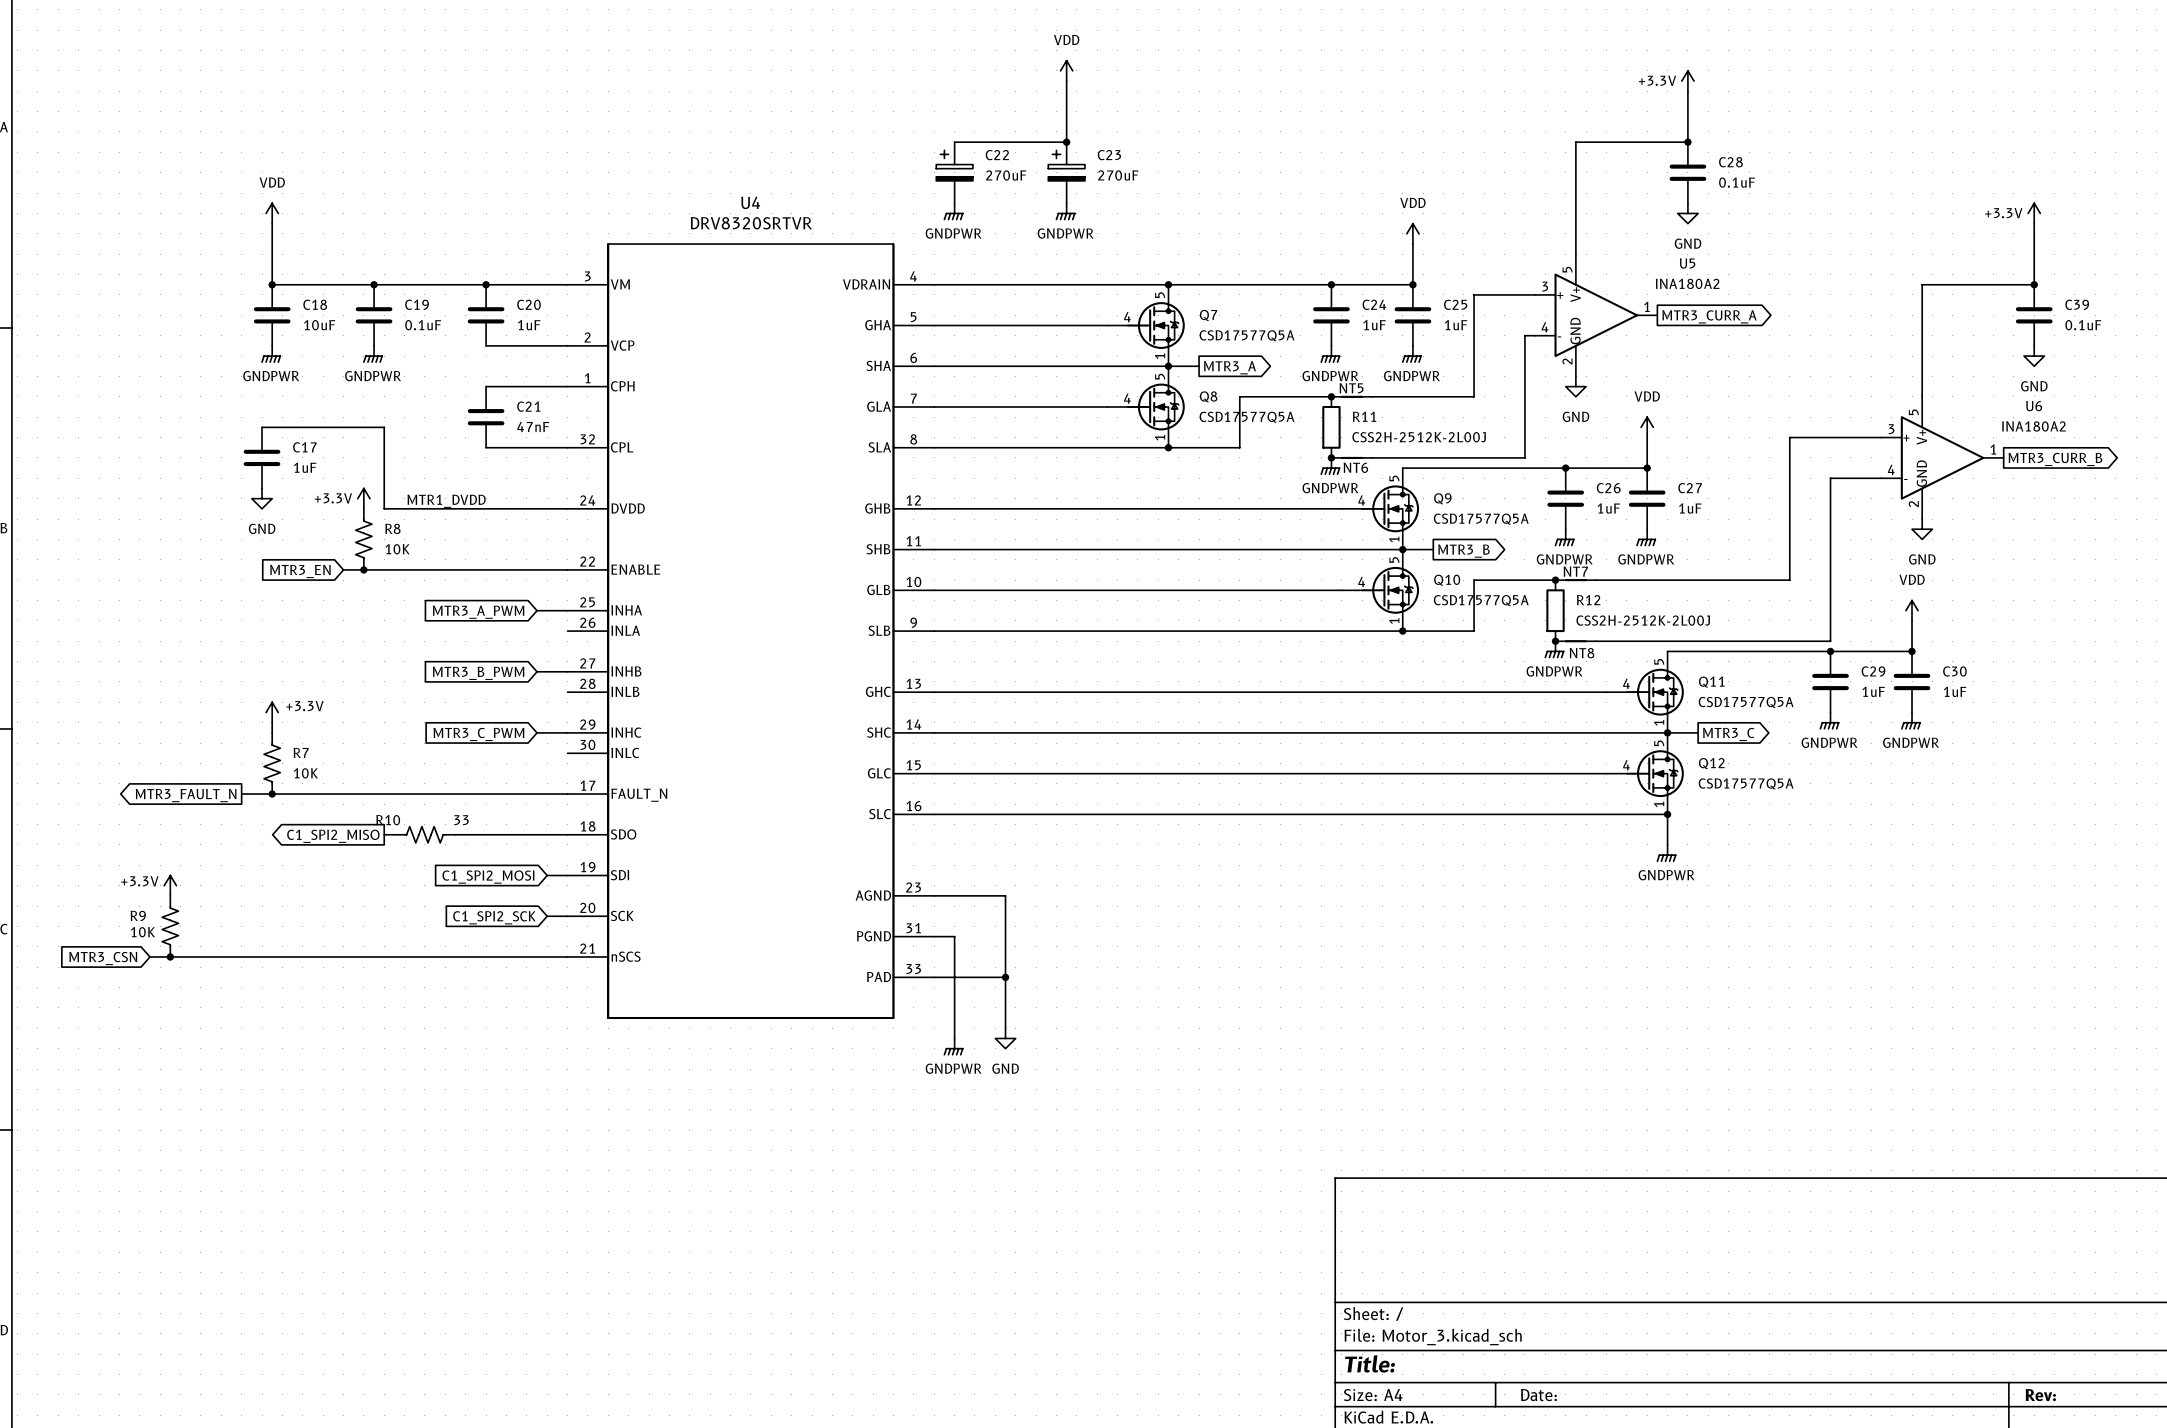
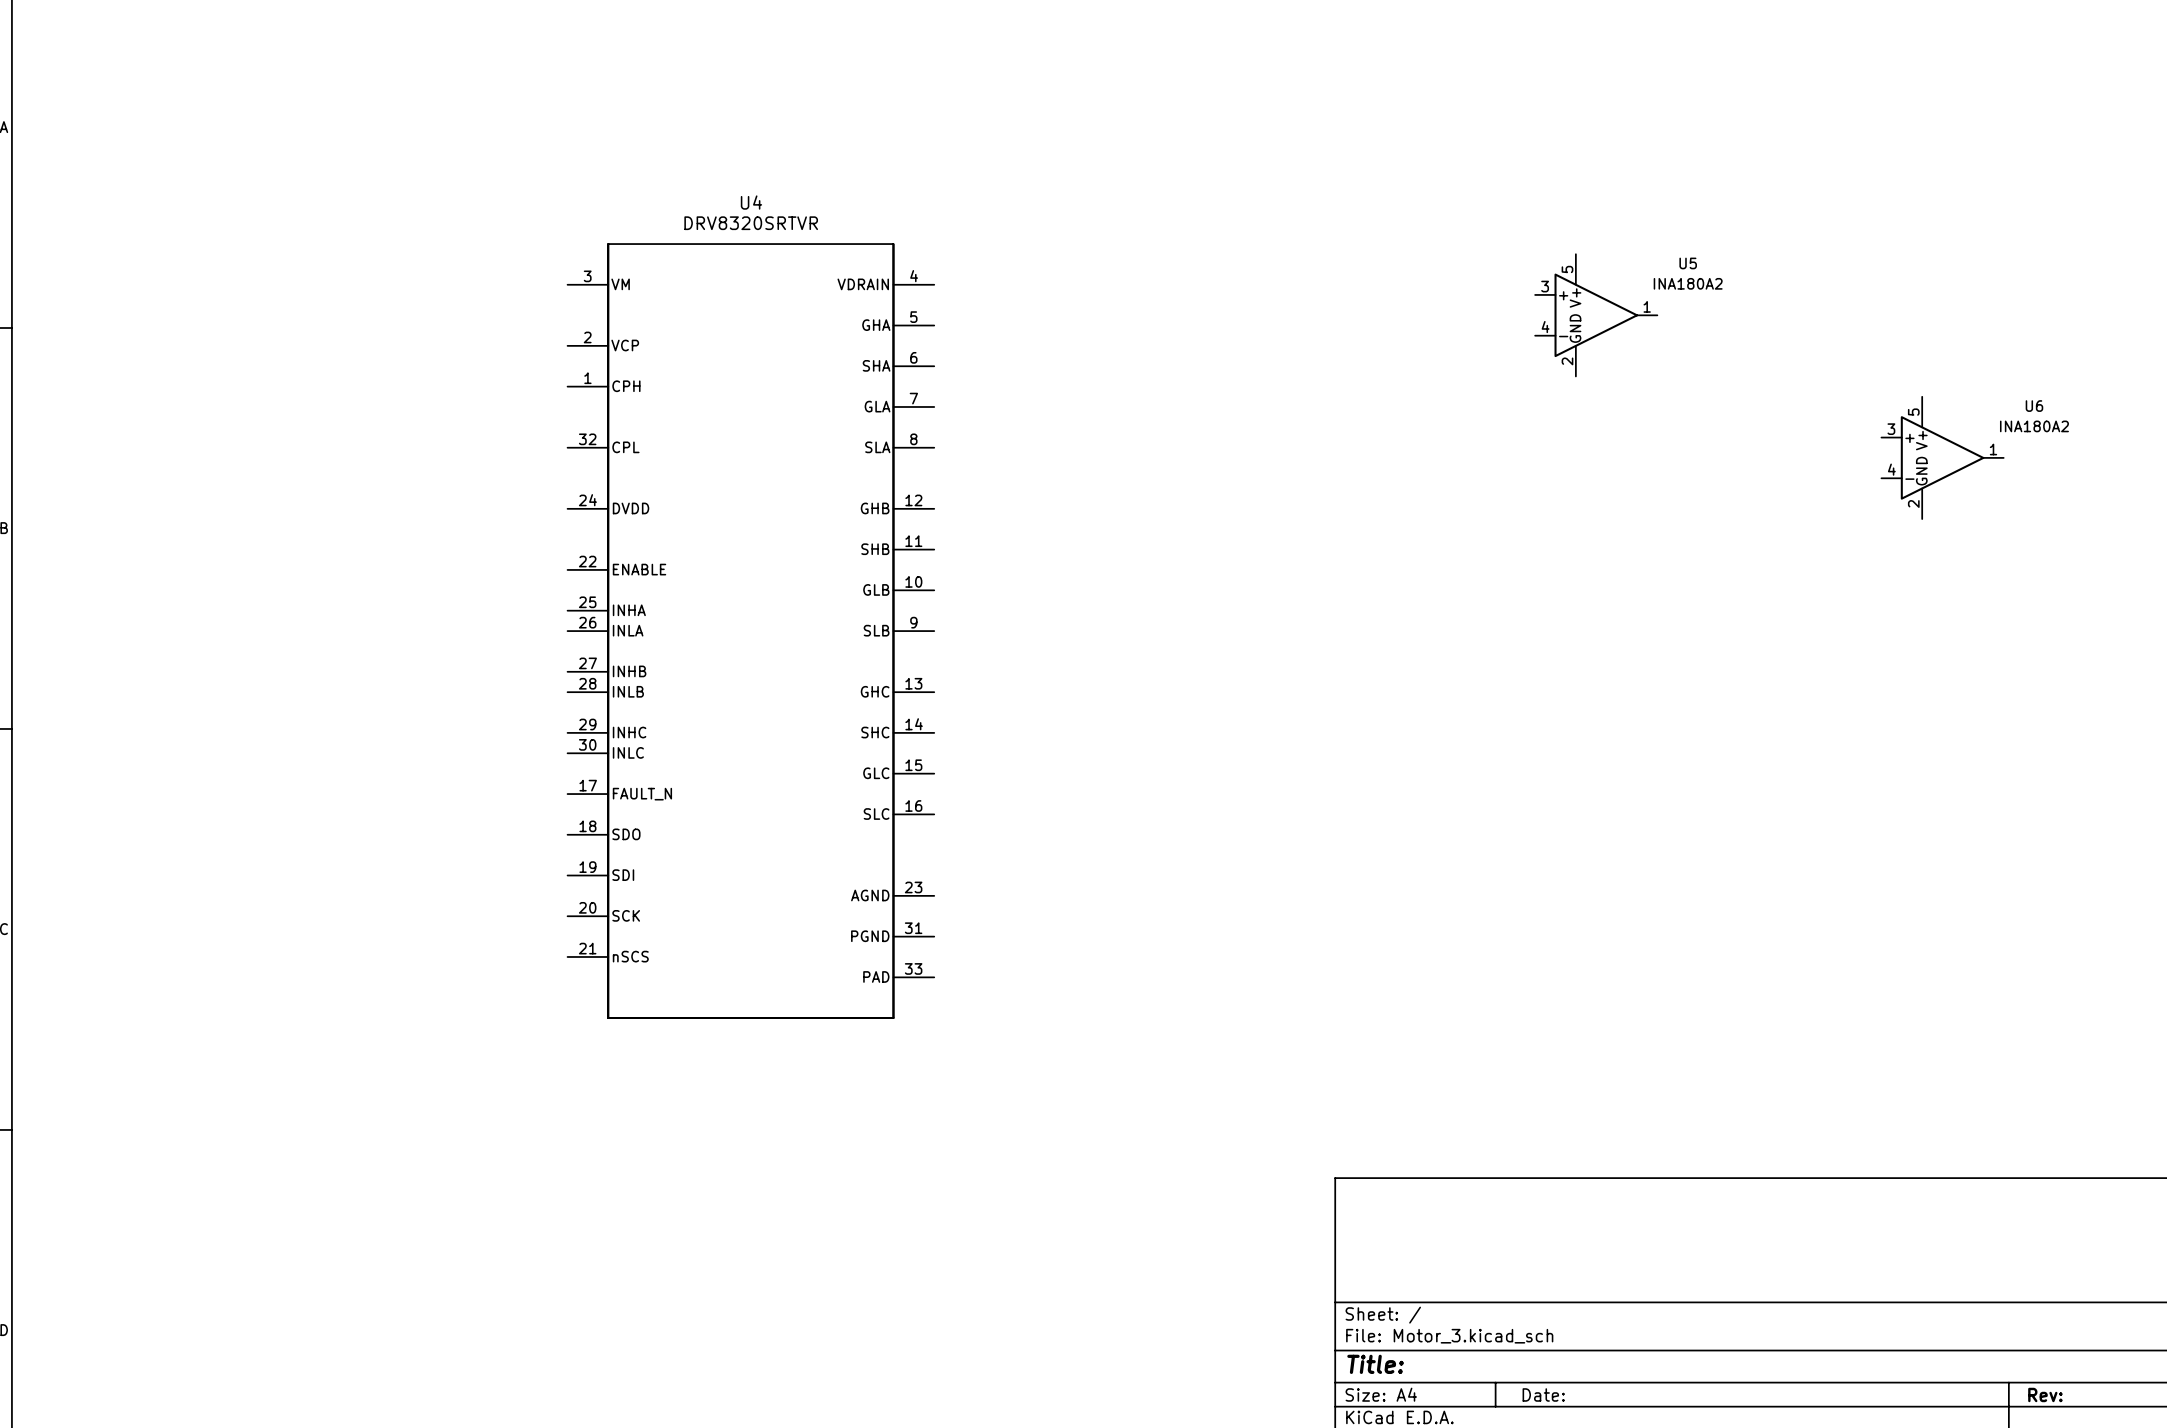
power symbol: VDD (1066, 70) -> none
wire: (1066, 81) (1066, 142) (954, 142) -> none
power symbol: +3.3V (1687, 81) -> none
wire: (1687, 91) (1687, 142) (1575, 142) (1575, 254) -> none
junction: (1066, 142) -> none
junction: (1687, 142) -> none
C22: 270uF (954, 172) -> none
C23: 270uF (1066, 172) -> none
C28: 0.1uF (1687, 172) -> none
power symbol: GNDPWR (953, 211) -> none
power symbol: GNDPWR (1065, 211) -> none
power symbol: VDD (272, 213) -> none
power symbol: GND (1687, 213) -> none
power symbol: +3.3V (2034, 213) -> none
wire: (272, 223) (272, 284) (567, 284) -> none
wire: (2034, 223) (2034, 284) (1922, 284) (1922, 396) -> none
power symbol: VDD (1412, 233) -> none
wire: (1412, 244) (1412, 284) (934, 284) -> none
junction: (272, 284) -> none
junction: (374, 284) -> none
junction: (486, 284) -> none
junction: (1168, 284) -> none
junction: (1331, 284) -> none
junction: (1412, 284) -> none
junction: (2034, 284) -> none
wire: (1535, 294) (1474, 294) (1474, 396) (1372, 396) -> none
C18: 10uF (272, 315) -> none
C19: 0.1uF (374, 315) -> none
C20: 1uF (486, 315) -> none
C24: 1uF (1331, 315) -> none
C25: 1uF (1412, 315) -> none
C39: 0.1uF (2034, 315) -> none
global label: MTR3_CURR_A (1709, 316) -> none
wire: (934, 325) (1107, 325) -> none
Q7: CSD17577Q5A (1146, 325) -> none
wire: (1535, 335) (1524, 335) (1524, 457) (1372, 457) -> none
wire: (486, 345) (567, 345) -> none
power symbol: GNDPWR (271, 354) -> none
power symbol: GNDPWR (373, 354) -> none
power symbol: GNDPWR (1330, 354) -> none
power symbol: GNDPWR (1411, 354) -> none
power symbol: GND (2034, 356) -> none
wire: (934, 366) (1199, 366) -> none
junction: (1168, 366) -> none
global label: MTR3_A (1230, 367) -> none
wire: (486, 386) (567, 386) -> none
power symbol: GND (1575, 386) -> none
wire: (1331, 396) (1239, 396) (1239, 447) (934, 447) -> none
junction: (1331, 396) -> none
NT5: (1351, 396) -> none
wire: (934, 406) (1107, 406) -> none
Q8: CSD17577Q5A (1146, 406) -> none
C21: 47nF (486, 417) -> none
wire: (262, 427) (384, 427) (384, 508) (567, 508) -> none
R11: CSS2H-2512K-2L00J (1331, 427) -> none
power symbol: VDD (1647, 427) -> none
wire: (1647, 437) (1647, 468) (1402, 468) -> none
wire: (1881, 437) (1789, 437) (1789, 580) (1596, 580) -> none
wire: (486, 447) (567, 447) -> none
junction: (1168, 447) -> none
C17: 1uF (262, 457) -> none
junction: (1331, 457) -> none
NT6: (1351, 457) -> none
global label: MTR3_CURR_B (2055, 459) -> none
power symbol: GNDPWR (1330, 466) -> none
junction: (1565, 468) -> none
junction: (1647, 468) -> none
wire: (1881, 478) (1830, 478) (1830, 641) (1596, 641) -> none
power symbol: GND (262, 498) -> none
power symbol: +3.3V (363, 498) -> none
C26: 1uF (1565, 498) -> none
C27: 1uF (1647, 498) -> none
label: MTR1_DVDD (446, 501) -> none
wire: (934, 508) (1341, 508) -> none
Q9: CSD17577Q5A (1380, 508) -> none
power symbol: GND (1922, 529) -> none
power symbol: GNDPWR (1564, 537) -> none
power symbol: GNDPWR (1646, 537) -> none
R8: 10K (363, 539) -> none
wire: (934, 549) (1433, 549) -> none
junction: (1402, 549) -> none
global label: MTR3_B (1463, 551) -> none
wire: (343, 569) (567, 569) -> none
junction: (363, 569) -> none
global label: MTR3_EN (300, 571) -> none
wire: (1555, 580) (1474, 580) (1474, 631) (934, 631) -> none
junction: (1555, 580) -> none
NT7: (1575, 580) -> none
wire: (934, 590) (1341, 590) -> none
Q10: CSD17577Q5A (1380, 590) -> none
wire: (537, 610) (567, 610) -> none
R12: CSS2H-2512K-2L00J (1555, 610) -> none
power symbol: VDD (1912, 610) -> none
global label: MTR3_A_PWM (478, 612) -> none
wire: (1912, 620) (1912, 651) (1667, 651) -> none
junction: (1402, 631) -> none
junction: (1555, 641) -> none
NT8: (1575, 641) -> none
power symbol: GNDPWR (1554, 649) -> none
junction: (1830, 651) -> none
junction: (1912, 651) -> none
wire: (537, 671) (567, 671) -> none
global label: MTR3_B_PWM (478, 673) -> none
C29: 1uF (1830, 681) -> none
C30: 1uF (1912, 681) -> none
wire: (934, 692) (1606, 692) -> none
Q11: CSD17577Q5A (1645, 692) -> none
power symbol: +3.3V (272, 712) -> none
power symbol: GNDPWR (1829, 721) -> none
power symbol: GNDPWR (1910, 721) -> none
wire: (272, 722) (272, 732) -> none
wire: (537, 732) (567, 732) -> none
wire: (934, 732) (1698, 732) -> none
junction: (1667, 732) -> none
global label: MTR3_C_PWM (478, 734) -> none
global label: MTR3_C (1728, 734) -> none
R7: 10K (272, 763) -> none
wire: (934, 773) (1606, 773) -> none
Q12: CSD17577Q5A (1645, 773) -> none
wire: (241, 794) (567, 794) -> none
junction: (272, 794) -> none
global label: MTR3_FAULT_N (186, 795) -> none
wire: (934, 814) (1667, 814) (1667, 844) -> none
junction: (1667, 814) -> none
wire: (384, 834) (394, 834) -> none
R10: 33 (424, 834) -> none
wire: (455, 834) (567, 834) -> none
global label: C1_SPI2_MISO (333, 836) -> none
power symbol: GNDPWR (1666, 853) -> none
wire: (547, 875) (567, 875) -> none
global label: C1_SPI2_MOSI (488, 877) -> none
power symbol: +3.3V (170, 885) -> none
wire: (934, 895) (1005, 895) (1005, 1028) -> none
wire: (547, 916) (567, 916) -> none
global label: C1_SPI2_SCK (494, 917) -> none
R9: 10K (170, 926) -> none
wire: (934, 936) (954, 936) (954, 1038) -> none
wire: (149, 956) (567, 956) -> none
junction: (170, 956) -> none
global label: MTR3_CSN (103, 958) -> none
wire: (934, 977) (1005, 977) -> none
junction: (1005, 977) -> none
power symbol: GND (1005, 1038) -> none
power symbol: GNDPWR (953, 1047) -> none

